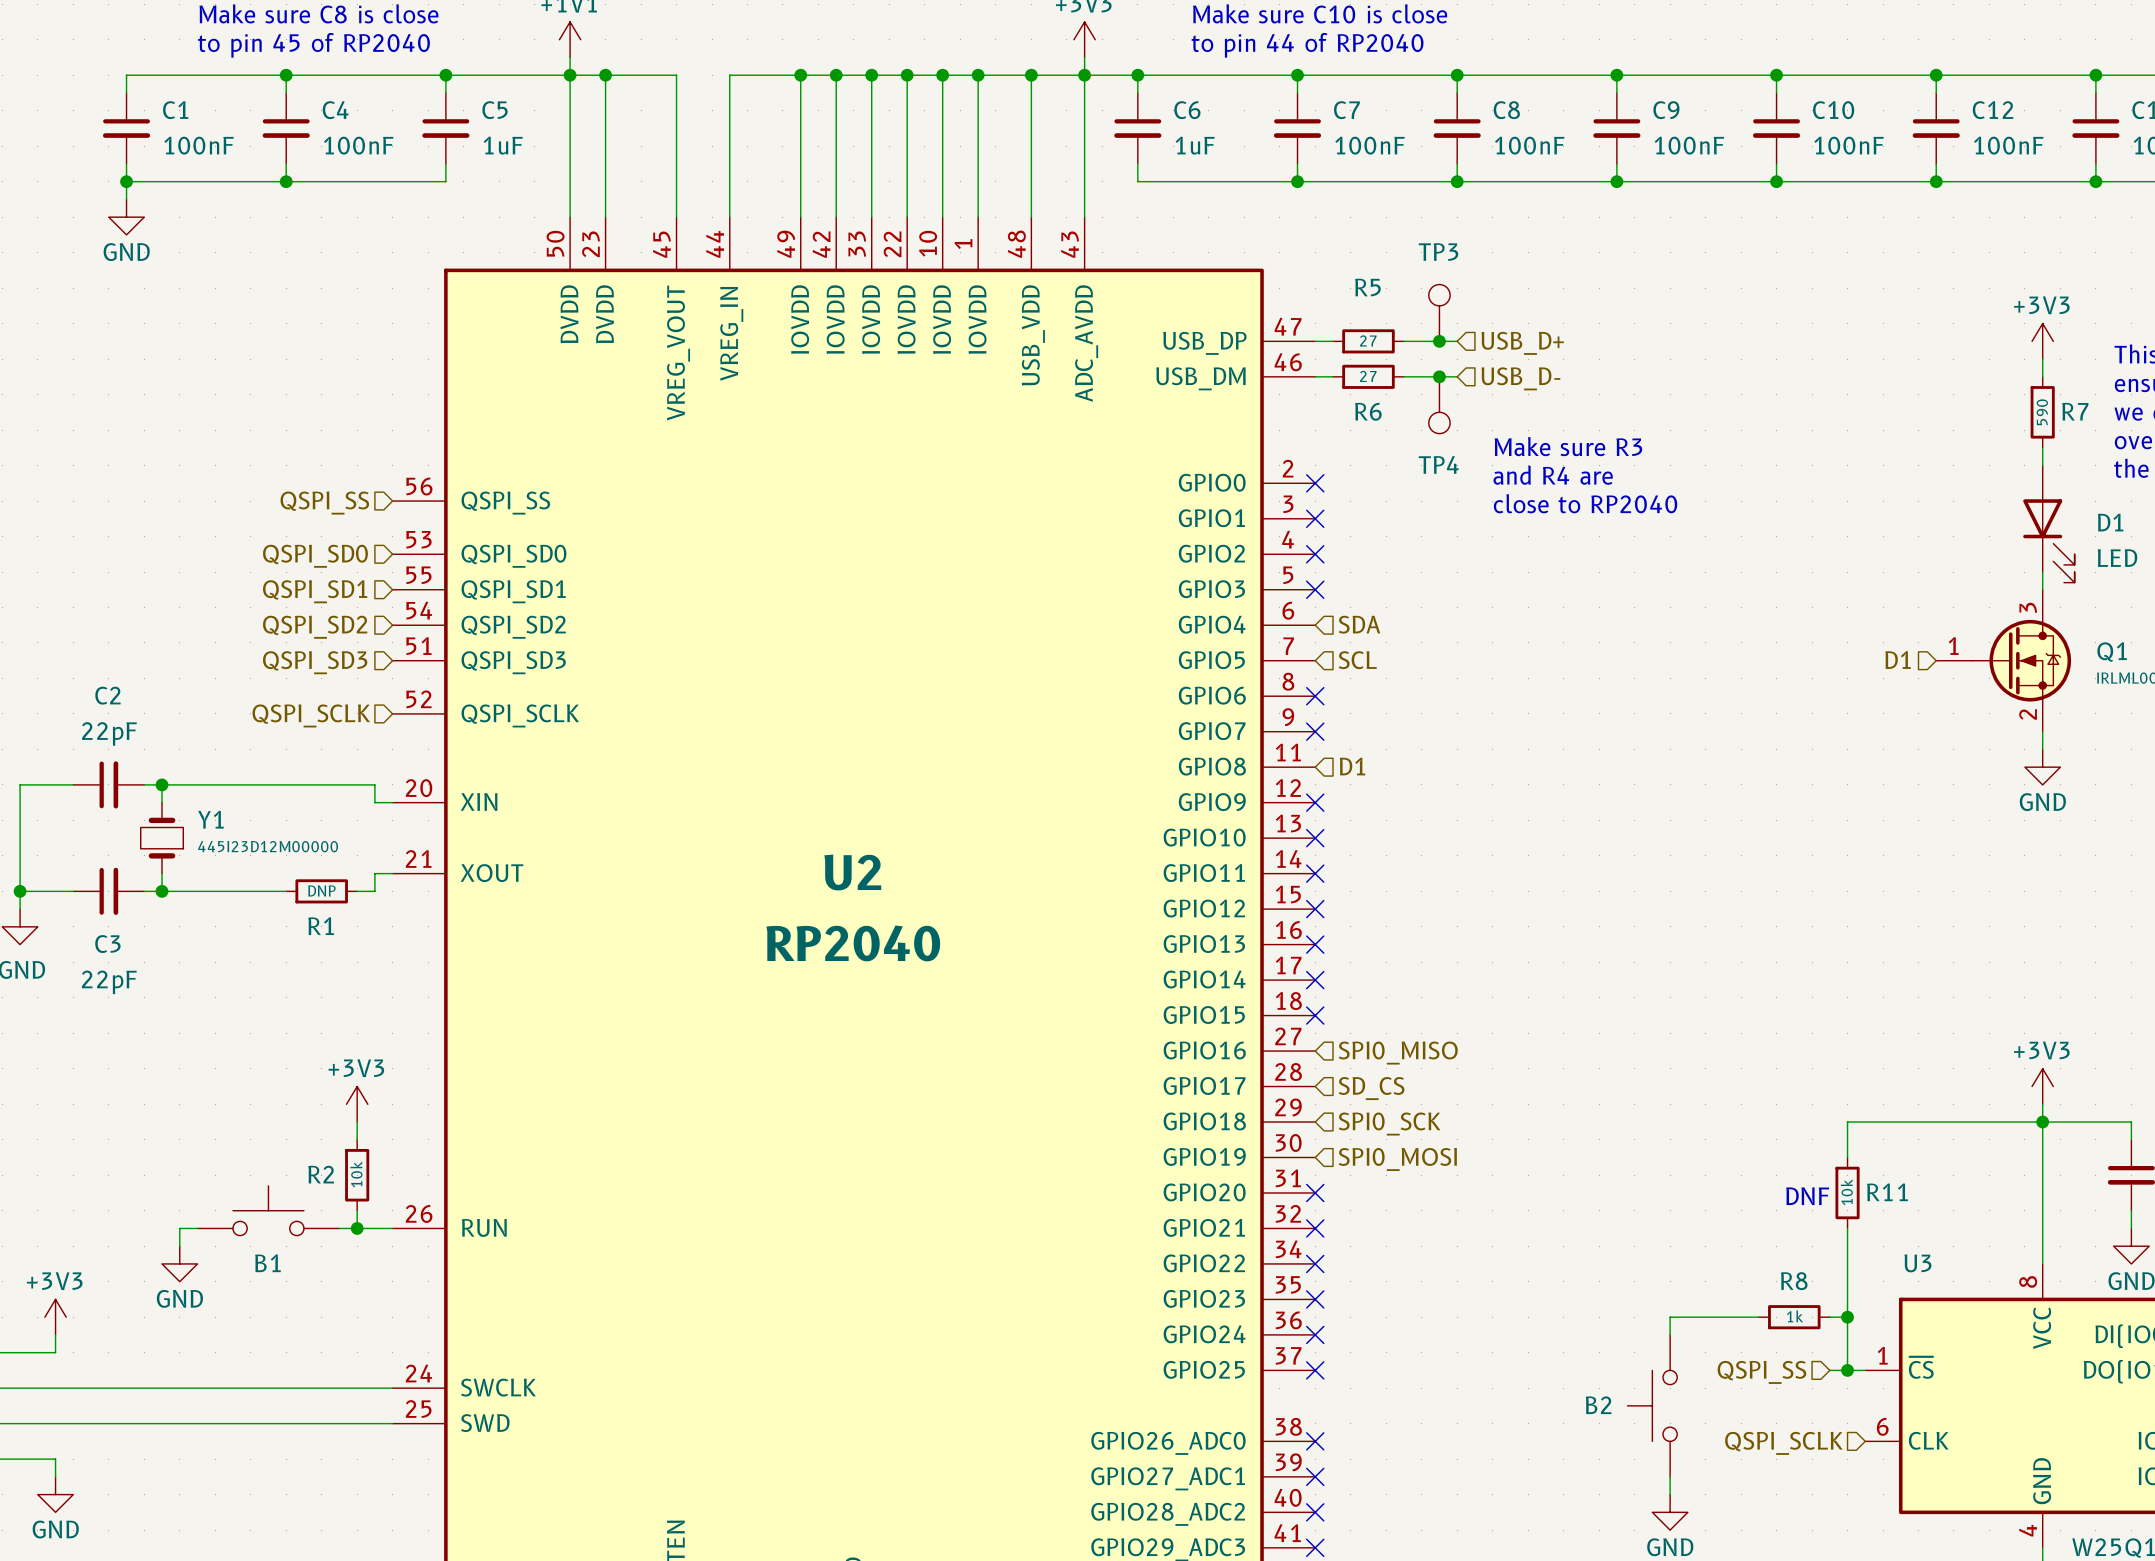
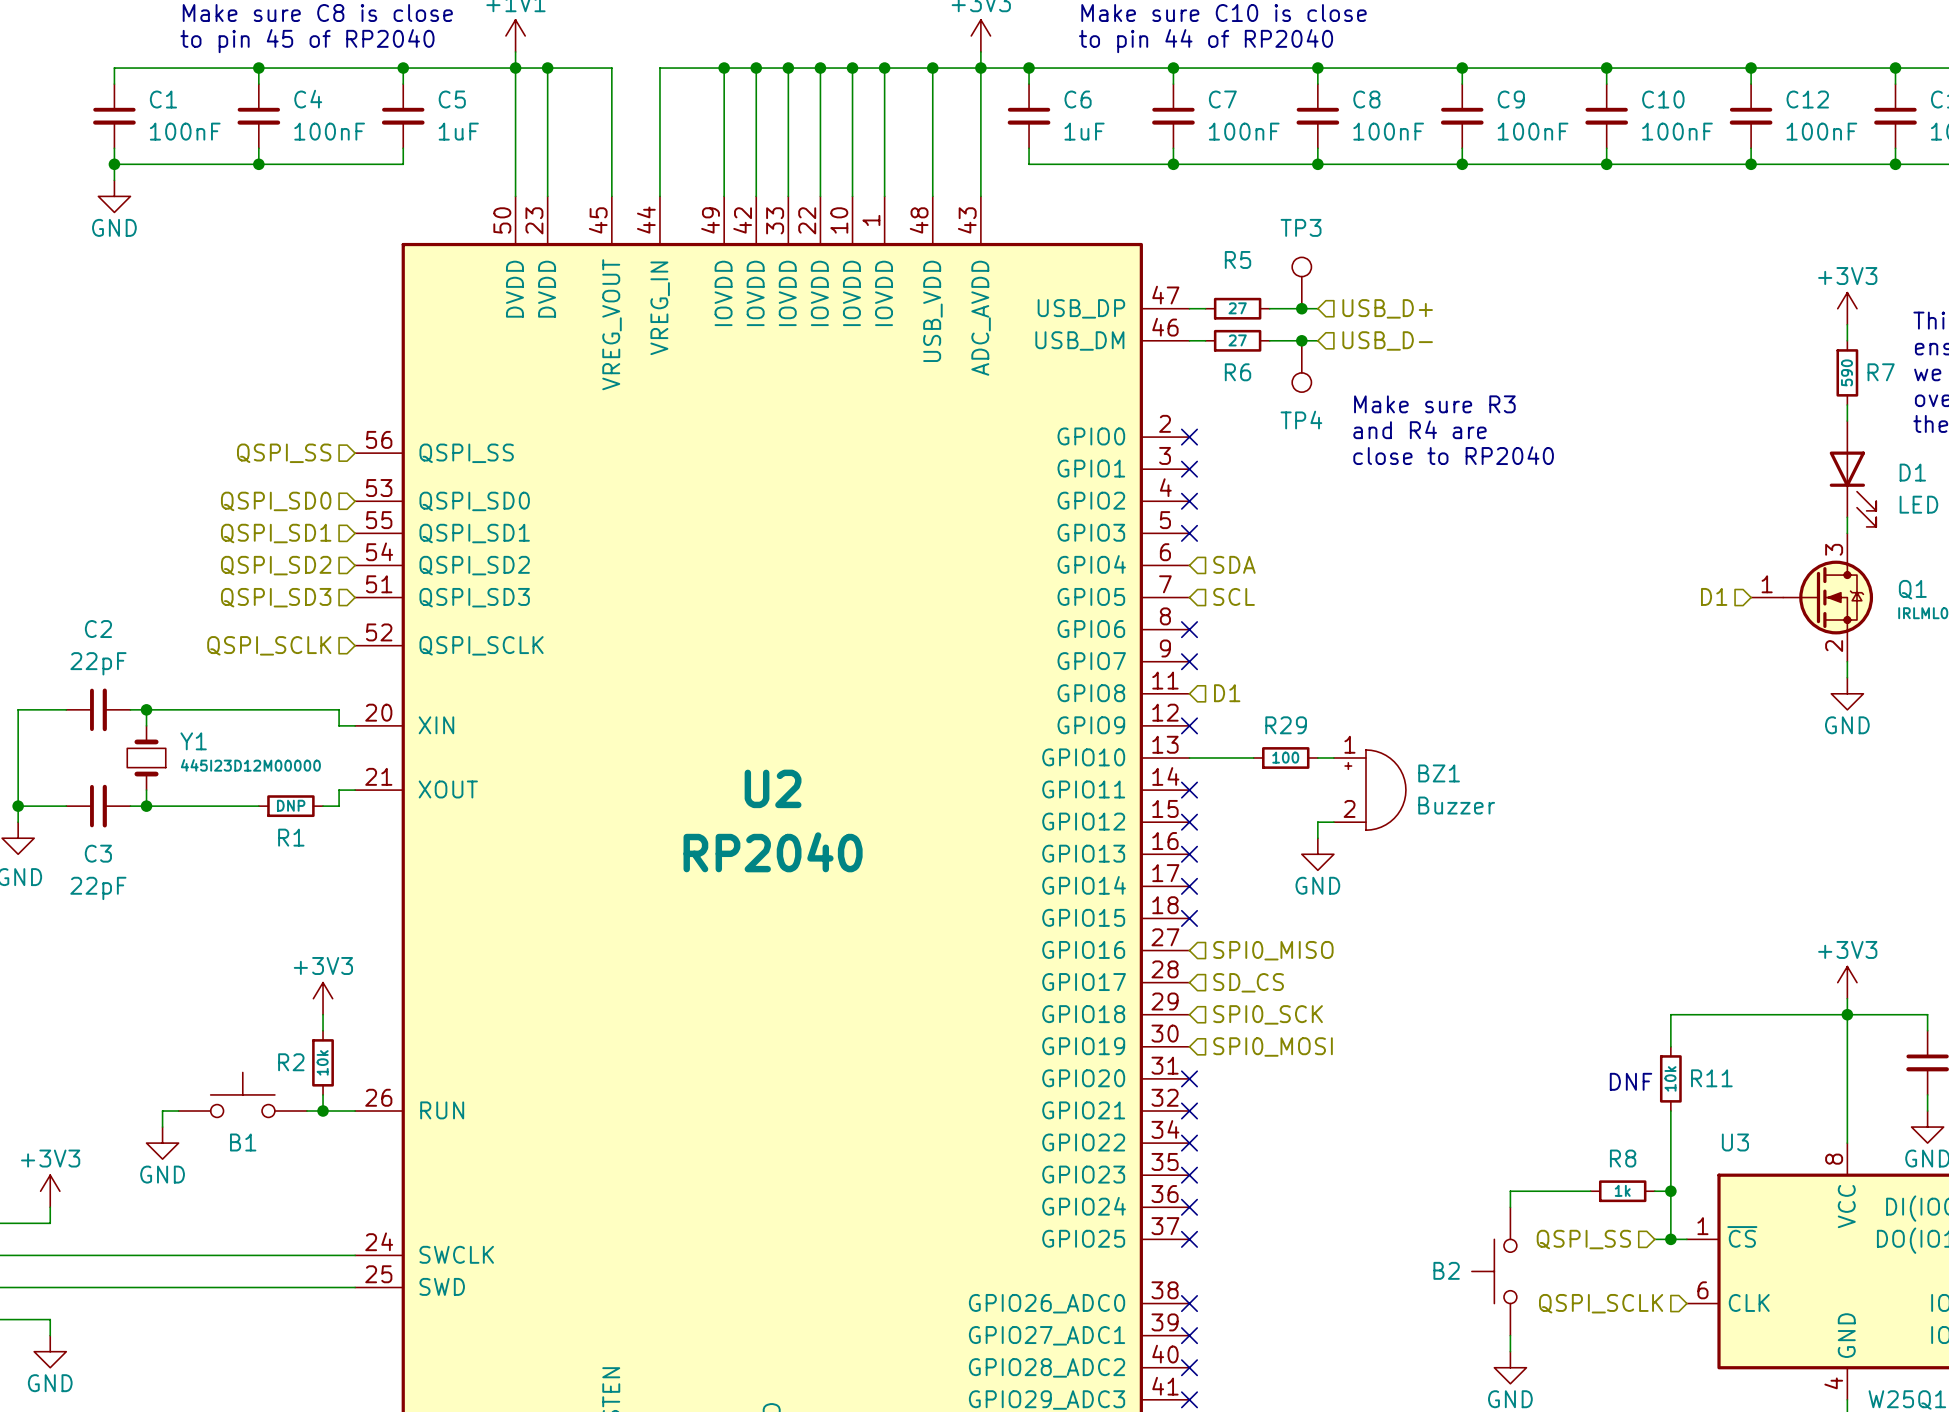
wire: none -> (1189, 757) (1253, 757)
no-connect mark: (1315, 838) -> none
R29: none -> 100 (1285, 757)
wire: none -> (1317, 757) (1333, 757)
BZ1: none -> Buzzer (1369, 790)
wire: none -> (1333, 822) (1317, 822) (1317, 838)
power symbol: none -> GND (1317, 854)

